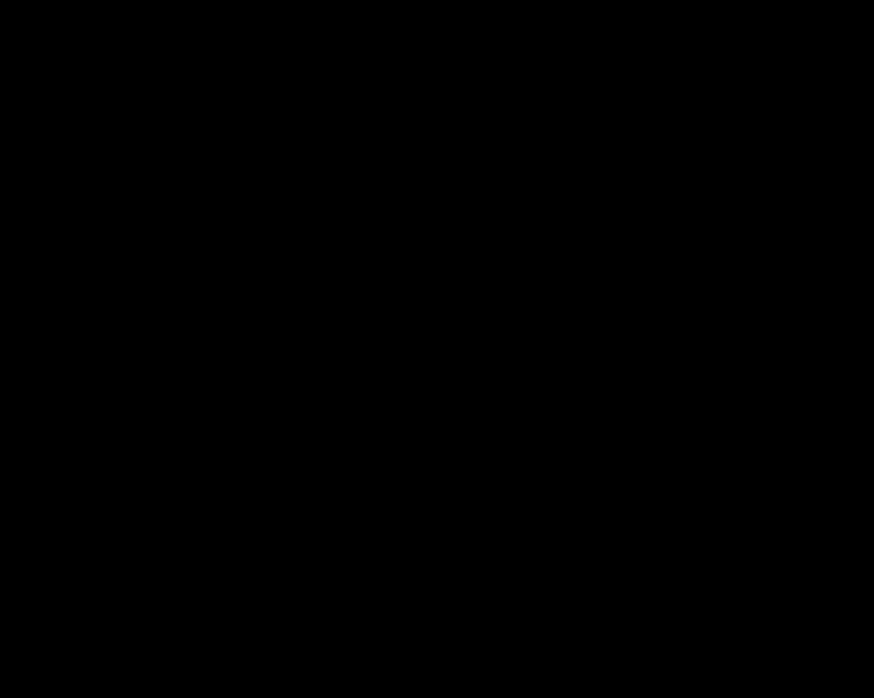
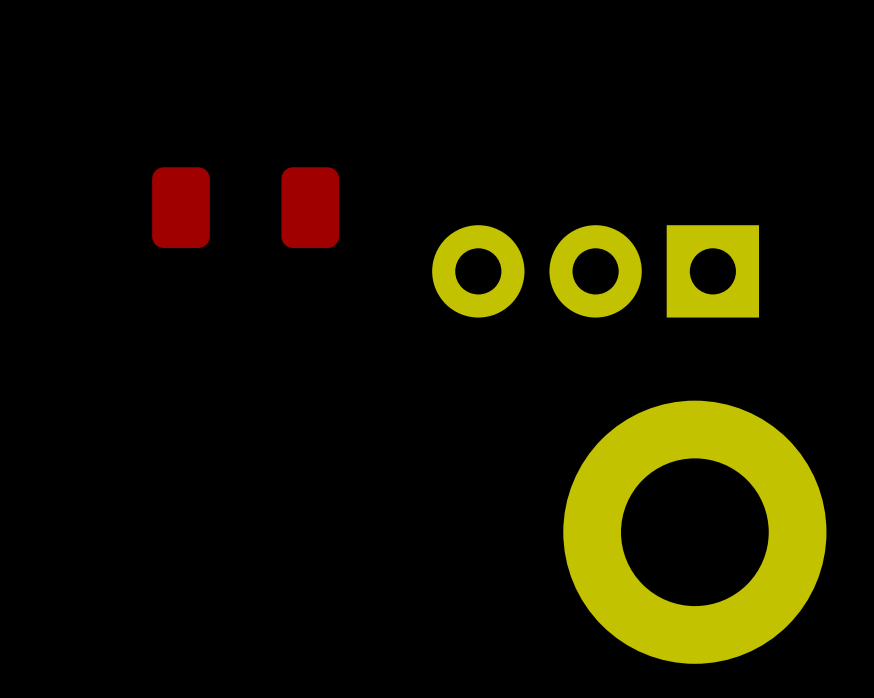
part: none -> (245, 207)
part: none -> (595, 271)
part: none -> (694, 532)

